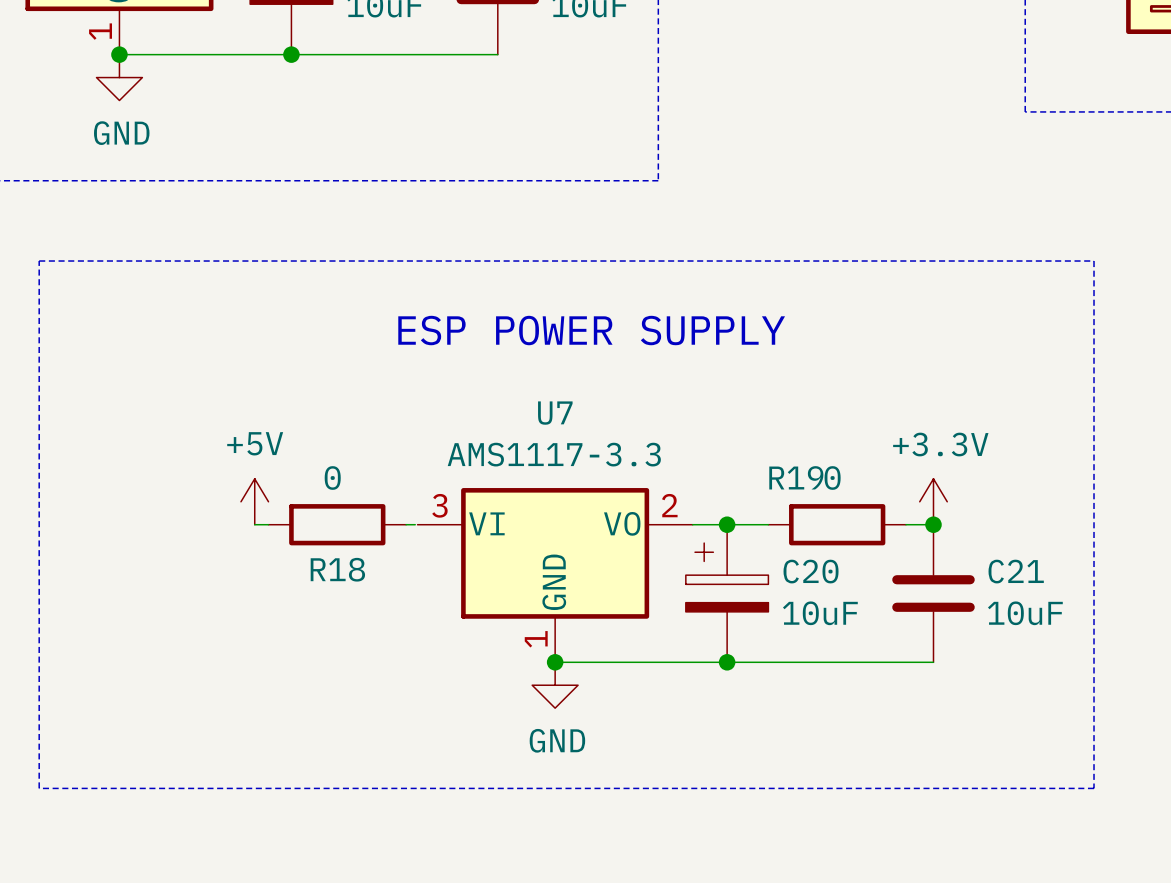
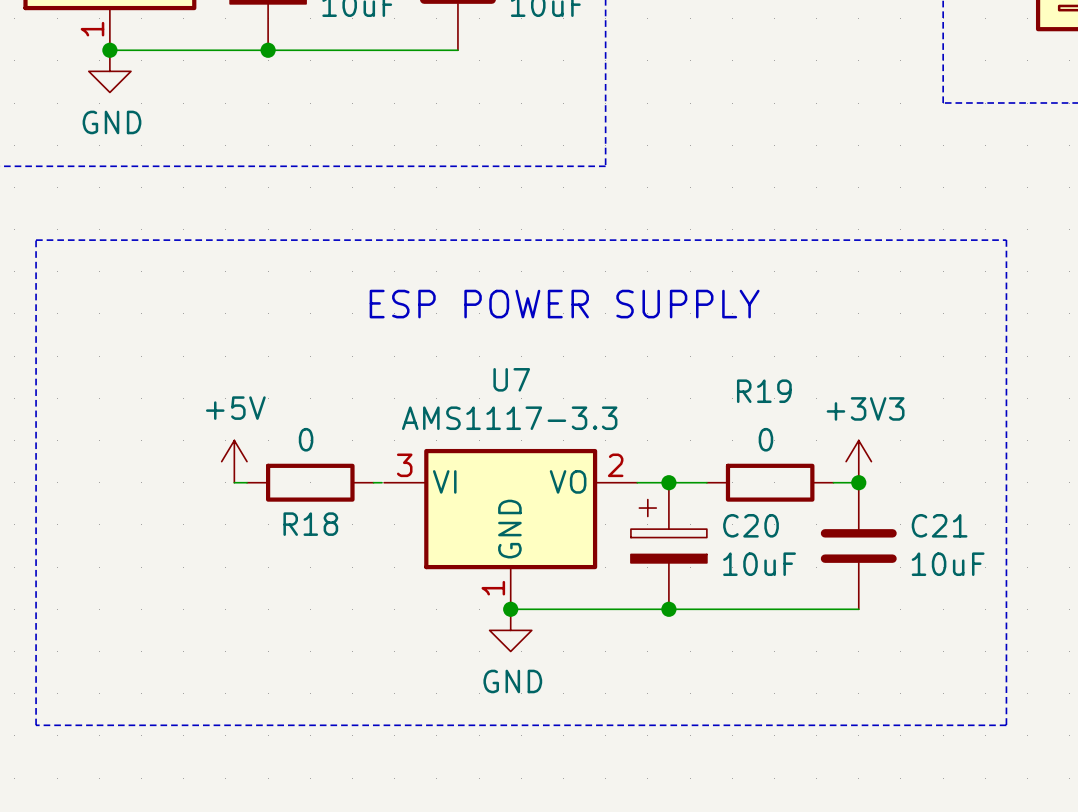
R19 name position: R19 (796, 477) -> R19 (764, 391)
power symbol: +3.3V (933, 501) -> +3V3 (858, 461)

